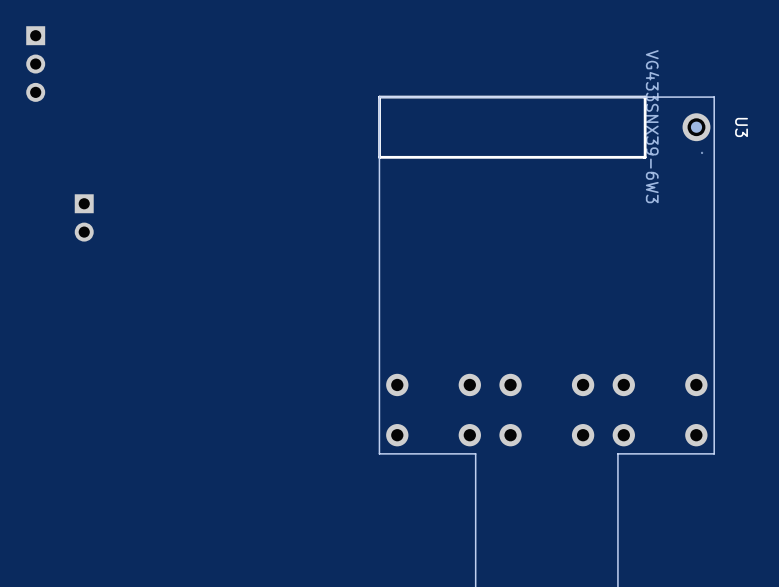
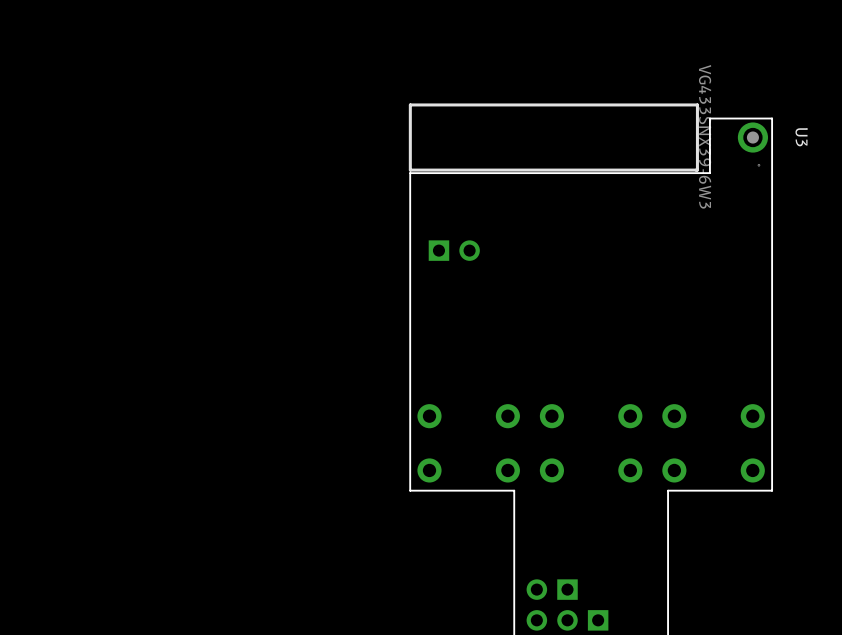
part: (35, 64) -> none
board edge: (714, 109) (714, 97) (379, 97) (379, 160) -> (772, 118) (709, 118) (709, 173) (410, 173)
part: (84, 217) -> none
part: none -> (454, 250)
part: none -> (552, 589)
part: none -> (567, 620)

